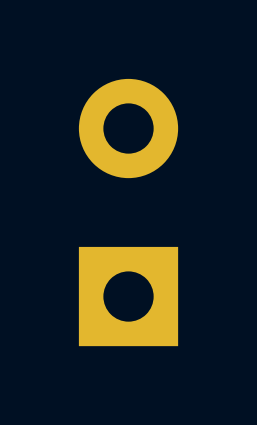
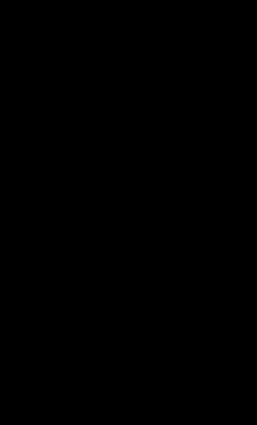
part: (128, 212) -> none

